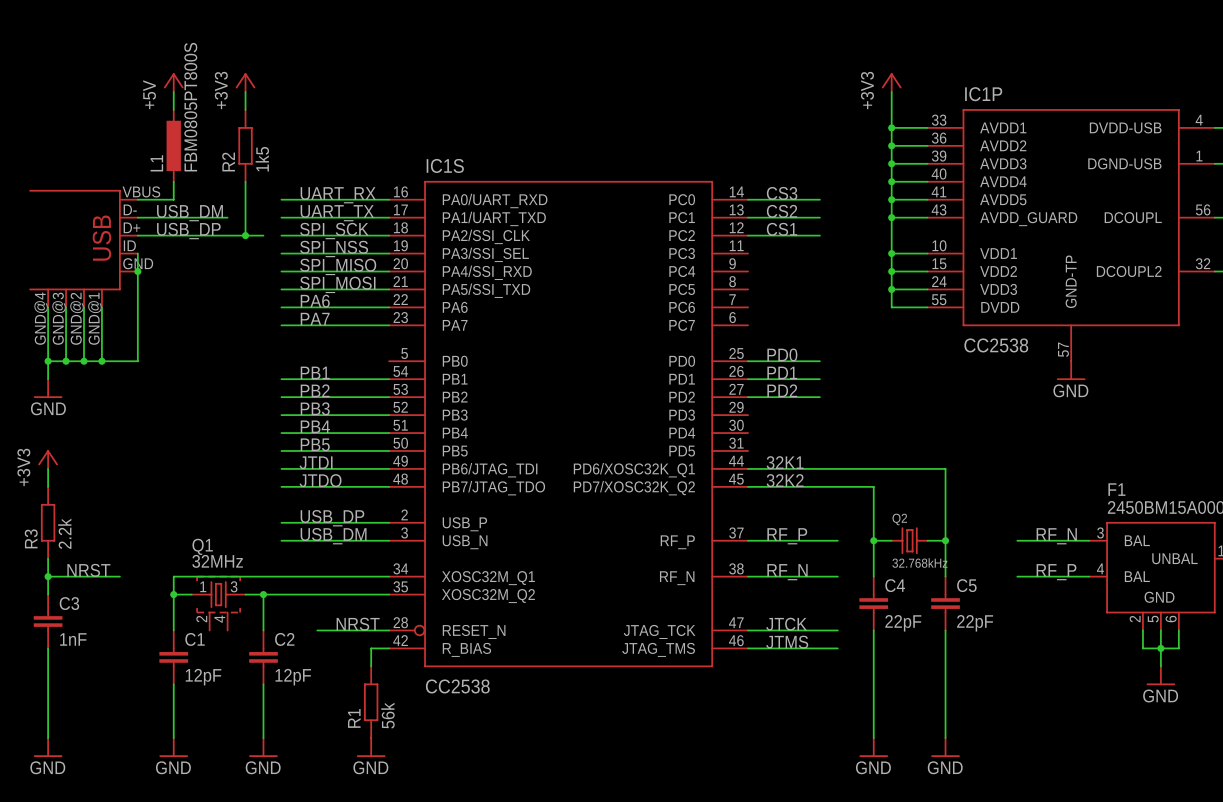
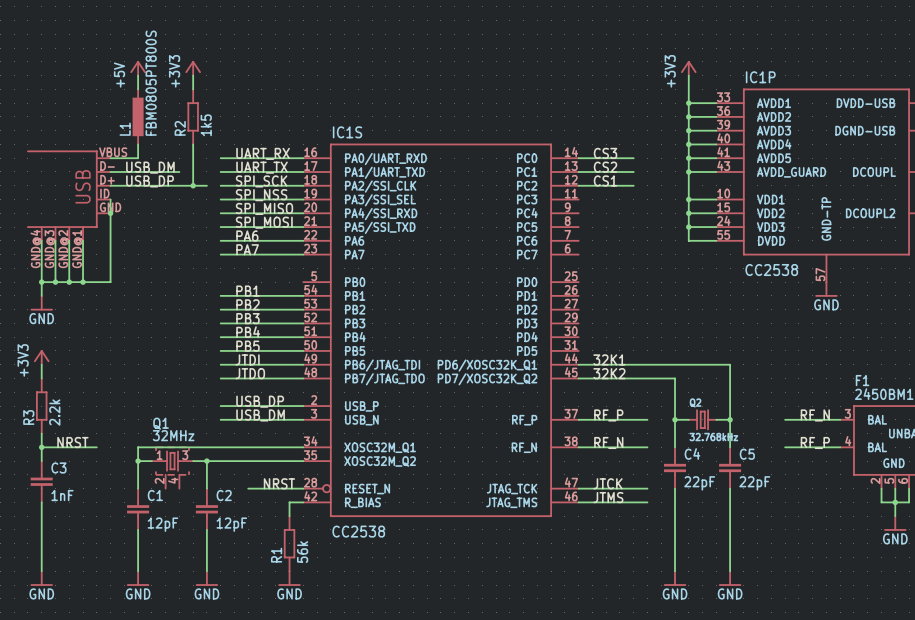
label: PD0 (782, 354) -> none
wire: (748, 361) (819, 361) -> none
label: PD1 (782, 372) -> none
wire: (748, 379) (819, 379) -> none
label: PD2 (782, 390) -> none
wire: (748, 397) (819, 397) -> none

